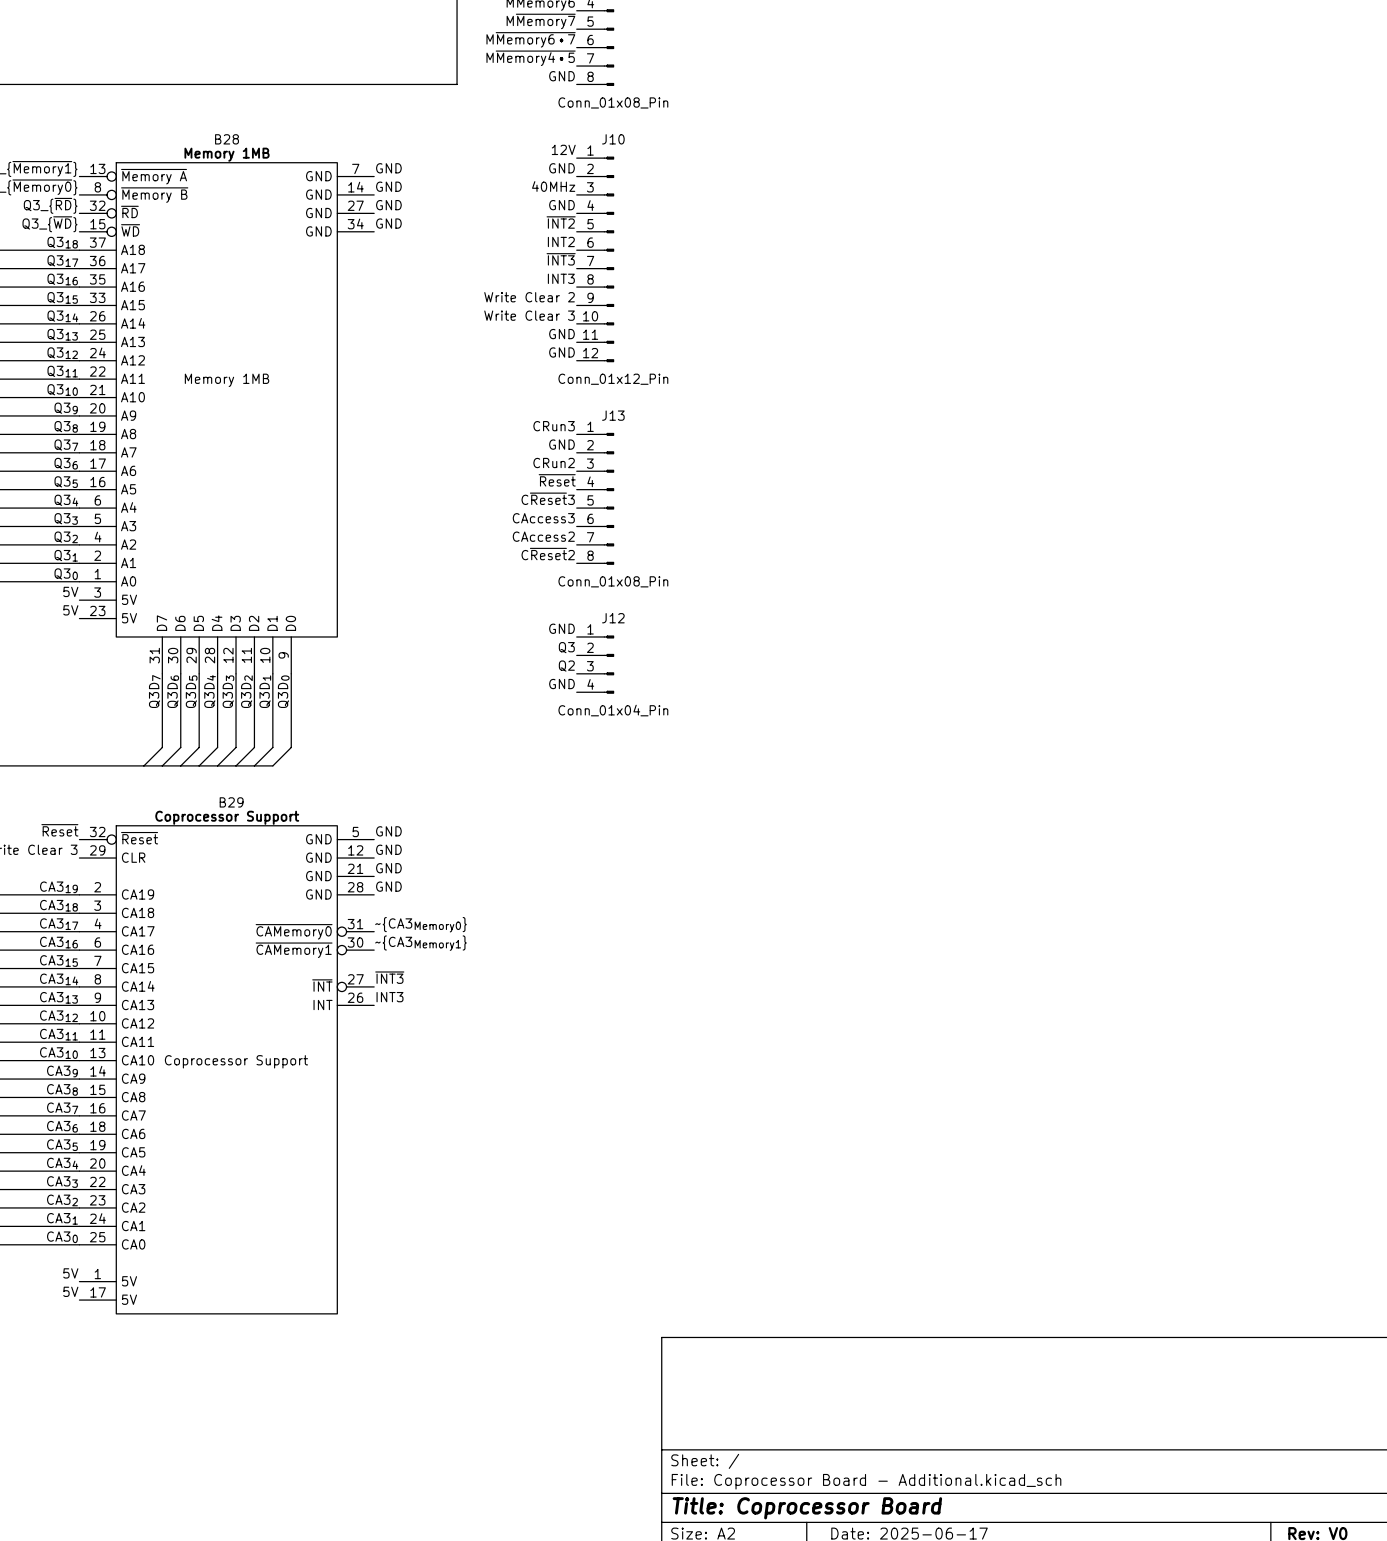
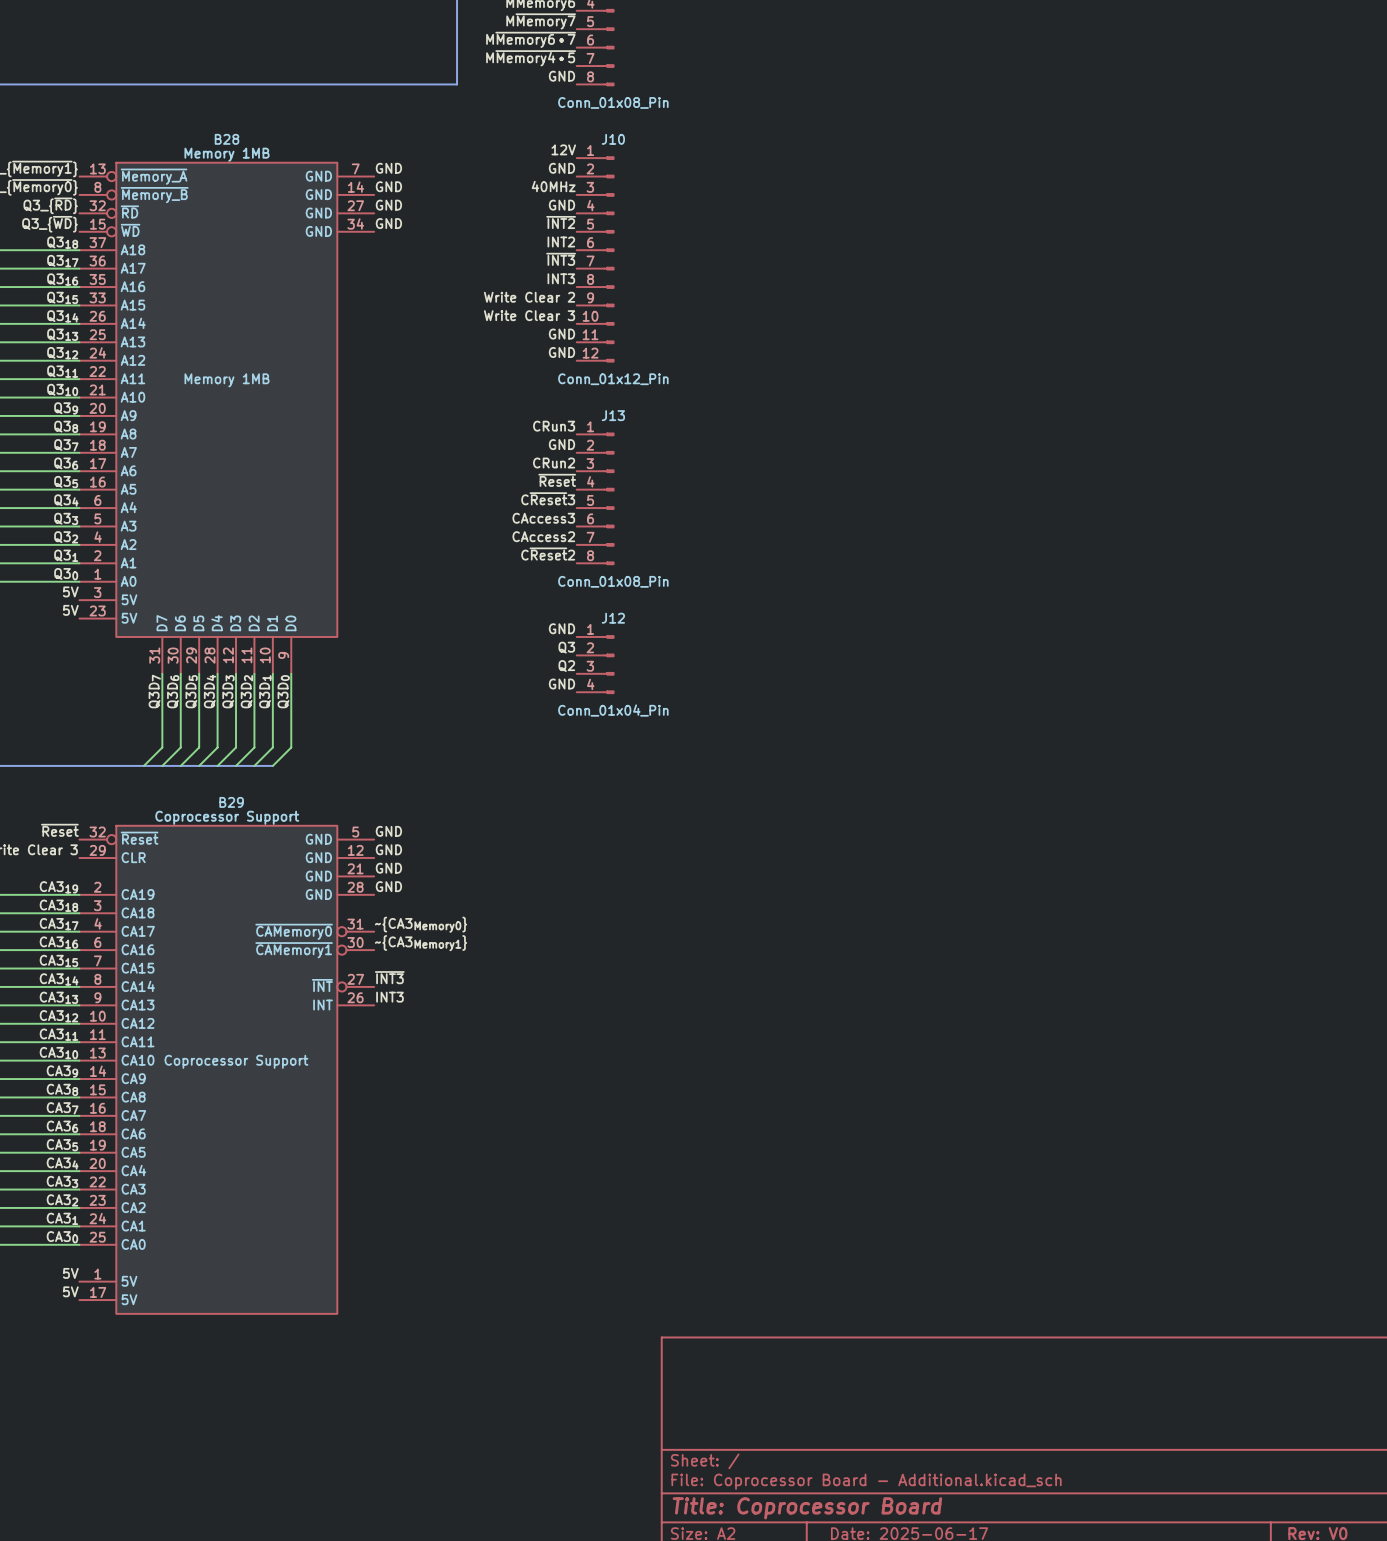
B28 pin name: ~{Memory A} (154, 176) -> ~{Memory_A} (154, 176)
B28 pin name: ~{Memory B} (154, 195) -> ~{Memory_B} (154, 195)

